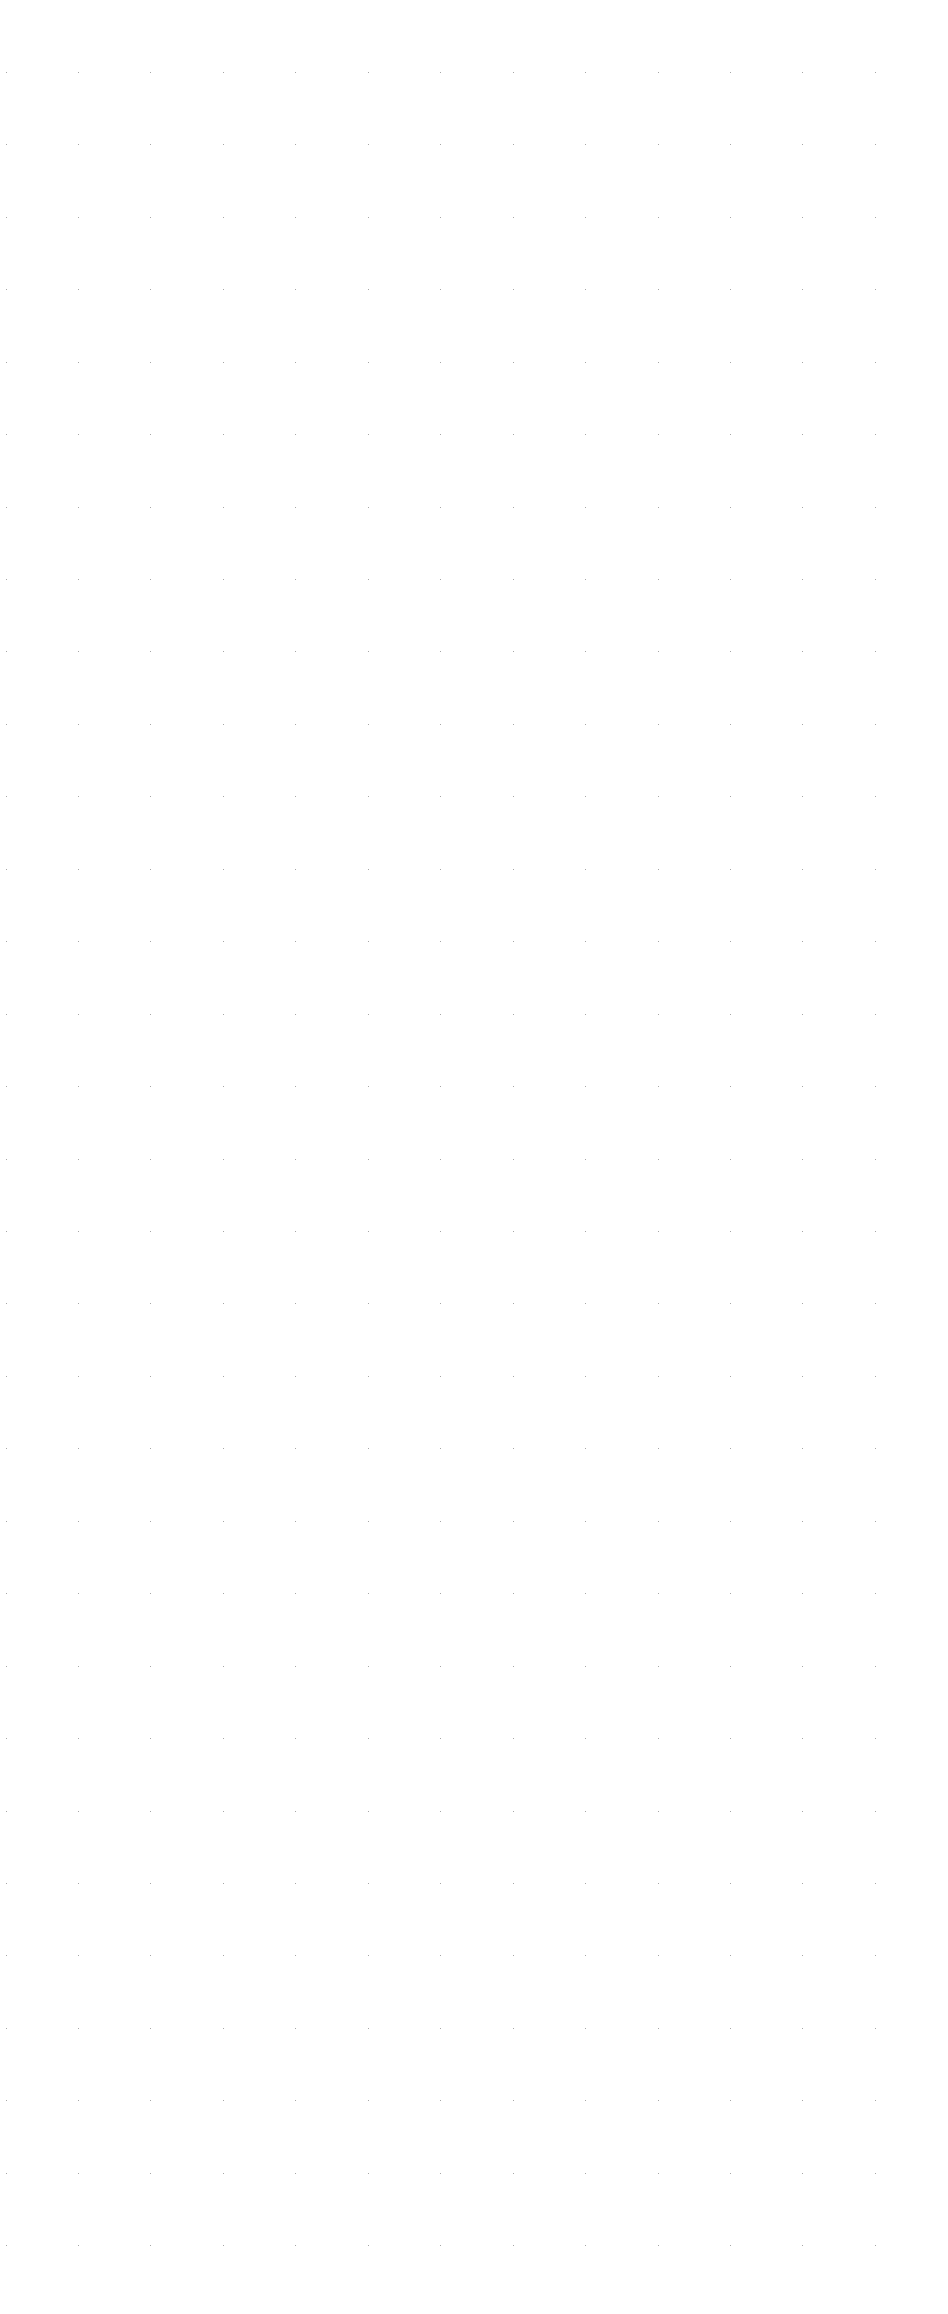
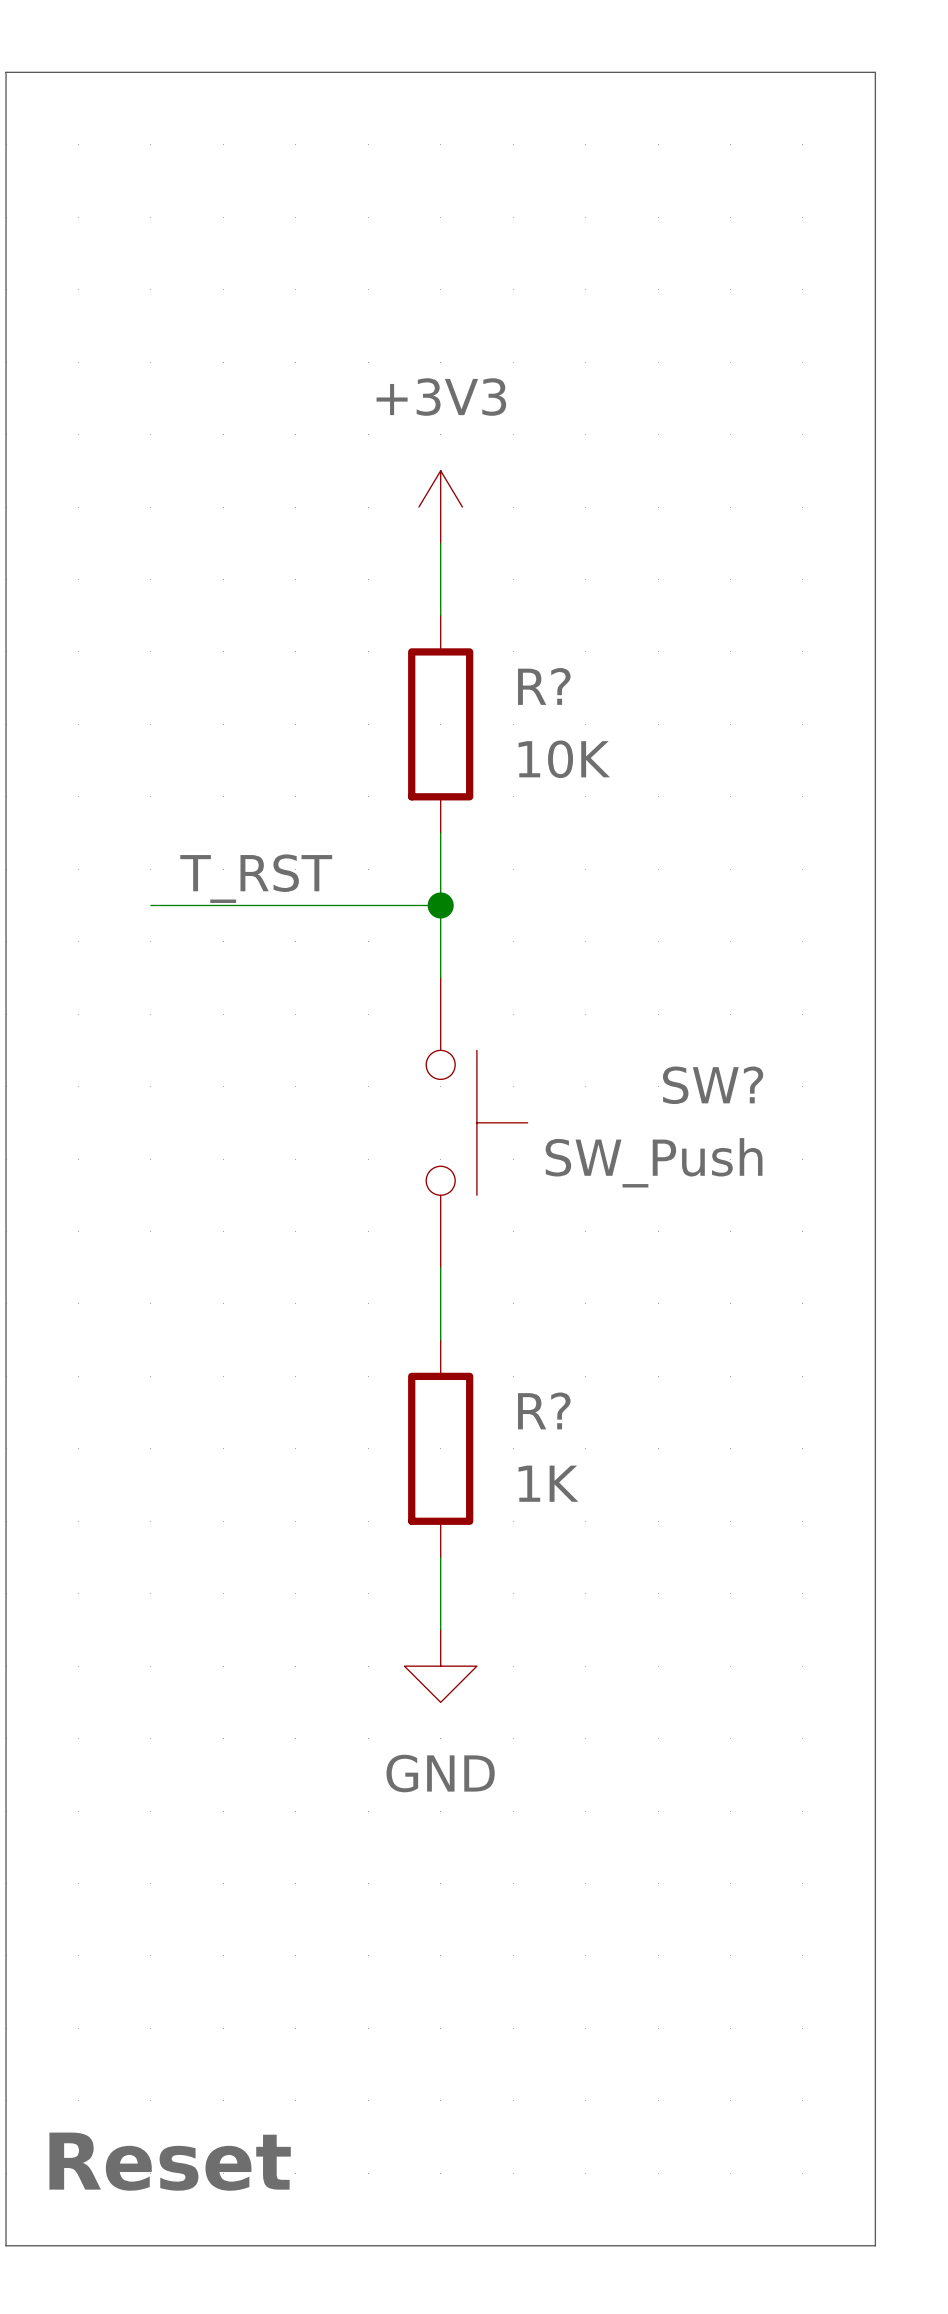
line: none -> (6, 72) (875, 72) (875, 2245) (6, 2245) (6, 72)
power symbol: none -> +3V3 (440, 507)
wire: none -> (440, 543) (440, 615)
R?: none -> 10K (440, 724)
wire: none -> (440, 833) (440, 977)
label: none -> T_RST (256, 878)
wire: none -> (150, 905) (440, 905)
junction: none -> (440, 905)
SW?: none -> SW_Push (476, 1122)
wire: none -> (440, 1267) (440, 1340)
R?: none -> 1K (440, 1448)
wire: none -> (440, 1557) (440, 1629)
power symbol: none -> GND (440, 1666)
label: none -> Reset (170, 2161)

